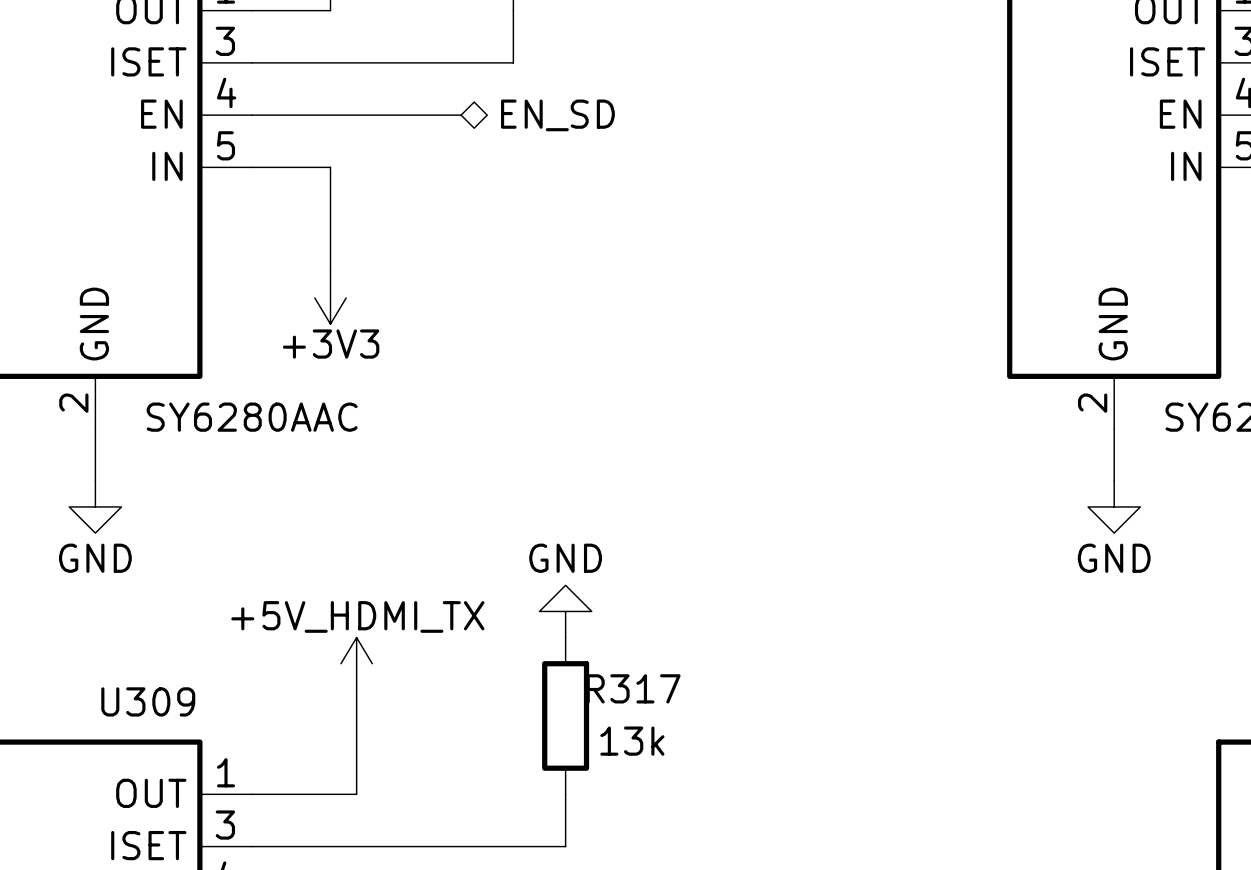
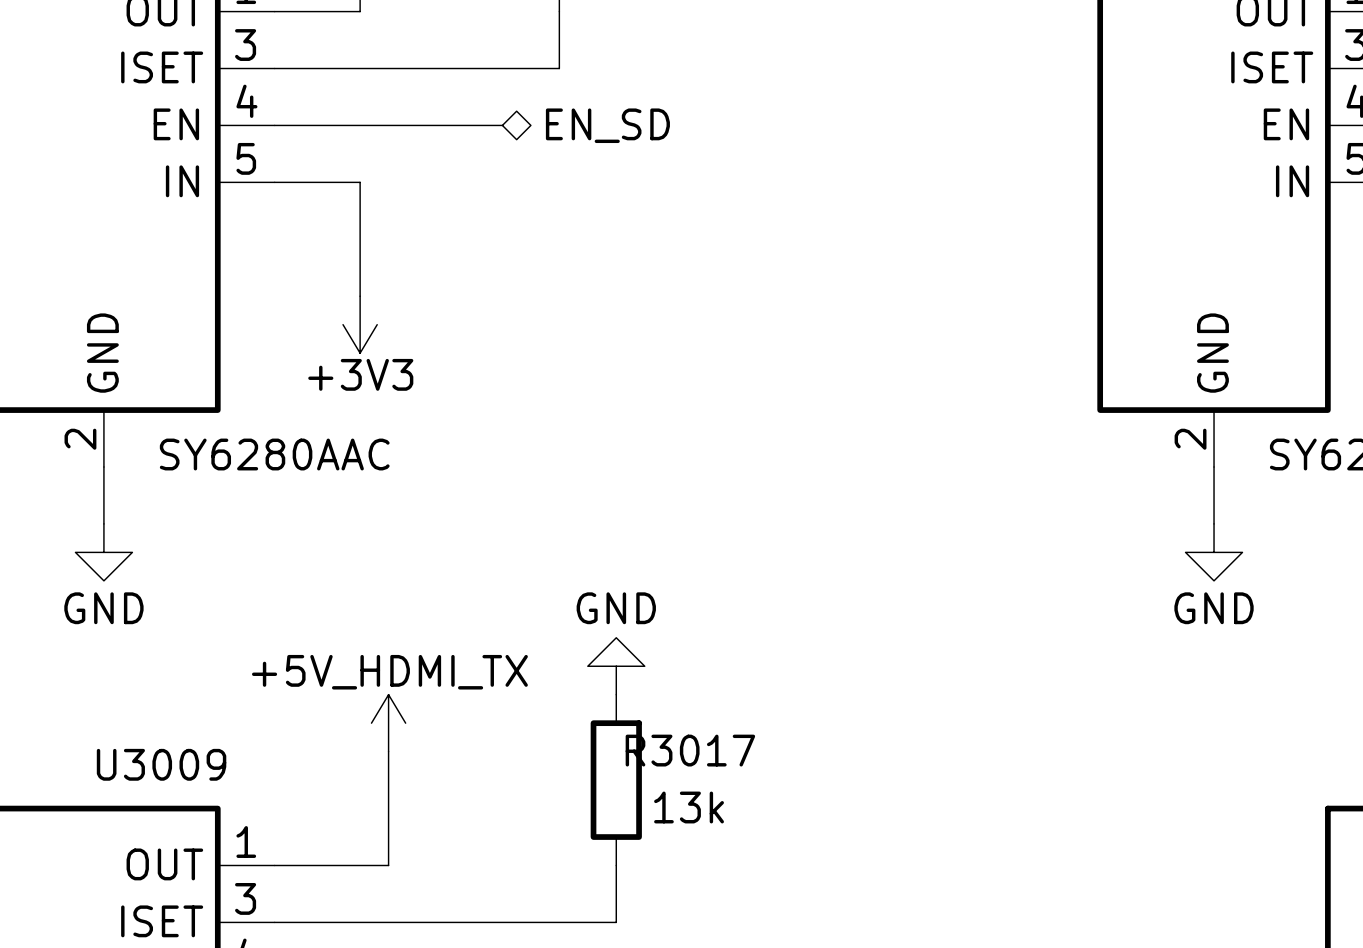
R317 name: R317 (633, 688) -> R3017 (690, 750)
U309 name: U309 (148, 701) -> U3009 (161, 764)

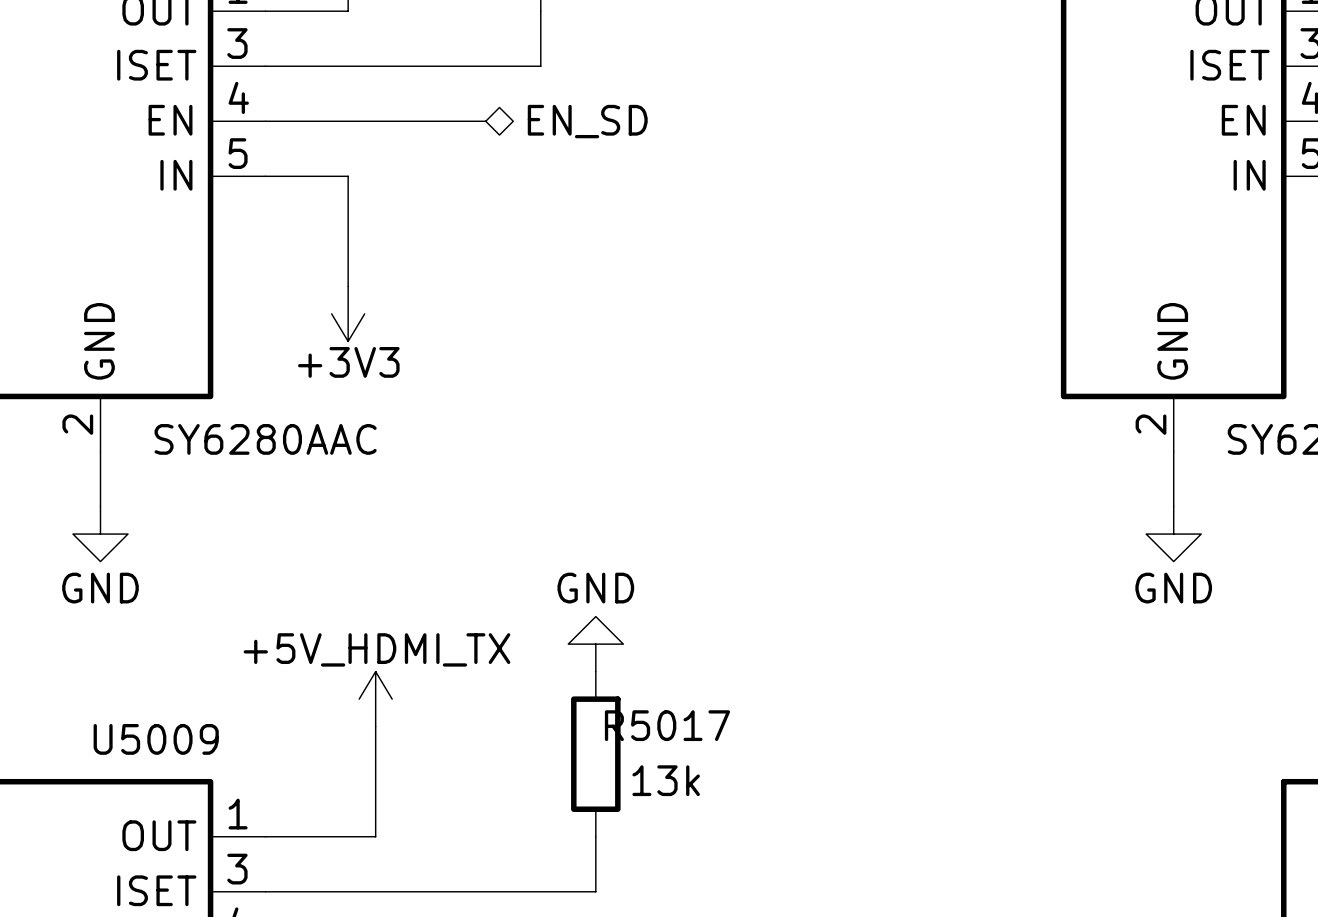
R3017 name: R3017 (690, 750) -> R5017 (667, 725)
U3009 name: U3009 (161, 764) -> U5009 (156, 739)

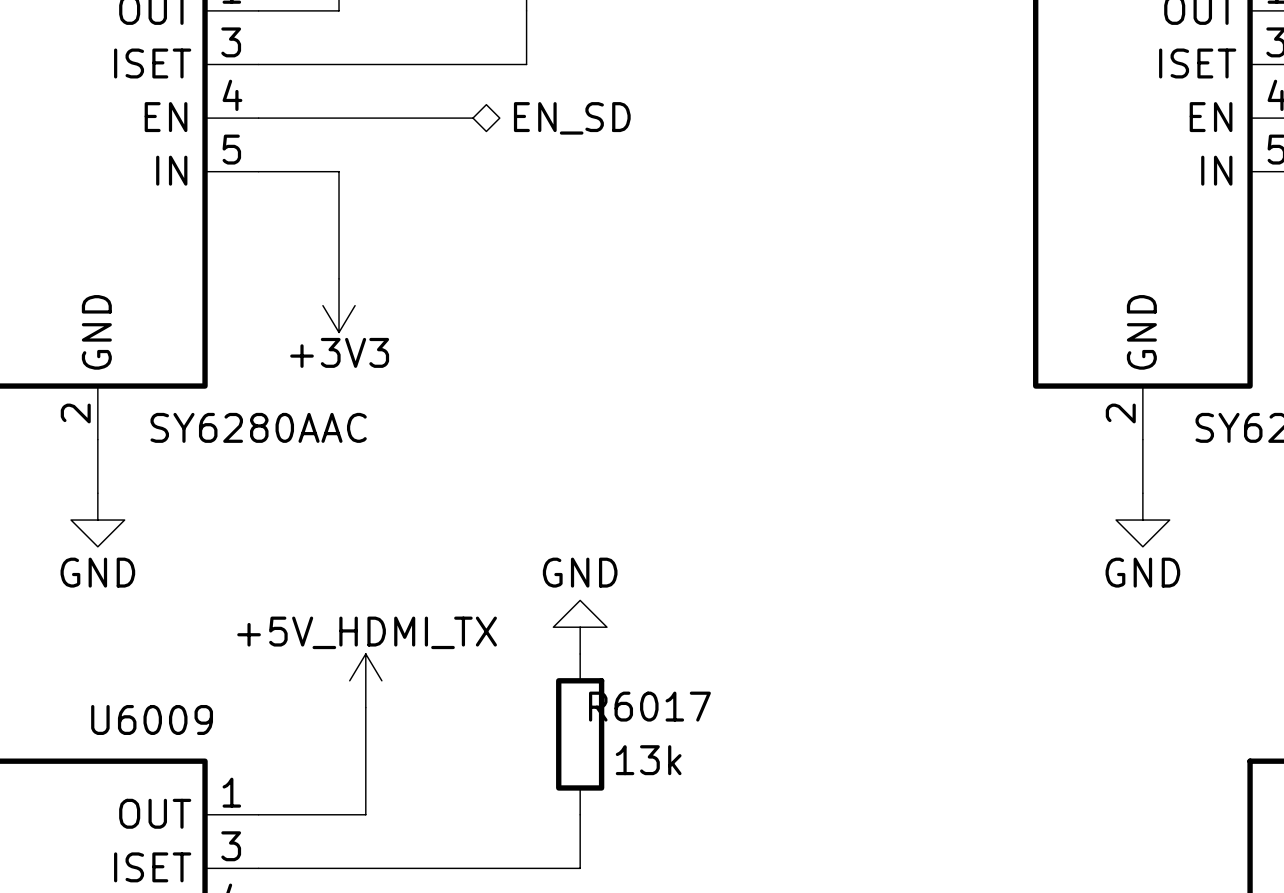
R5017 name: R5017 (667, 725) -> R6017 (649, 706)
U5009 name: U5009 (156, 739) -> U6009 (152, 719)

